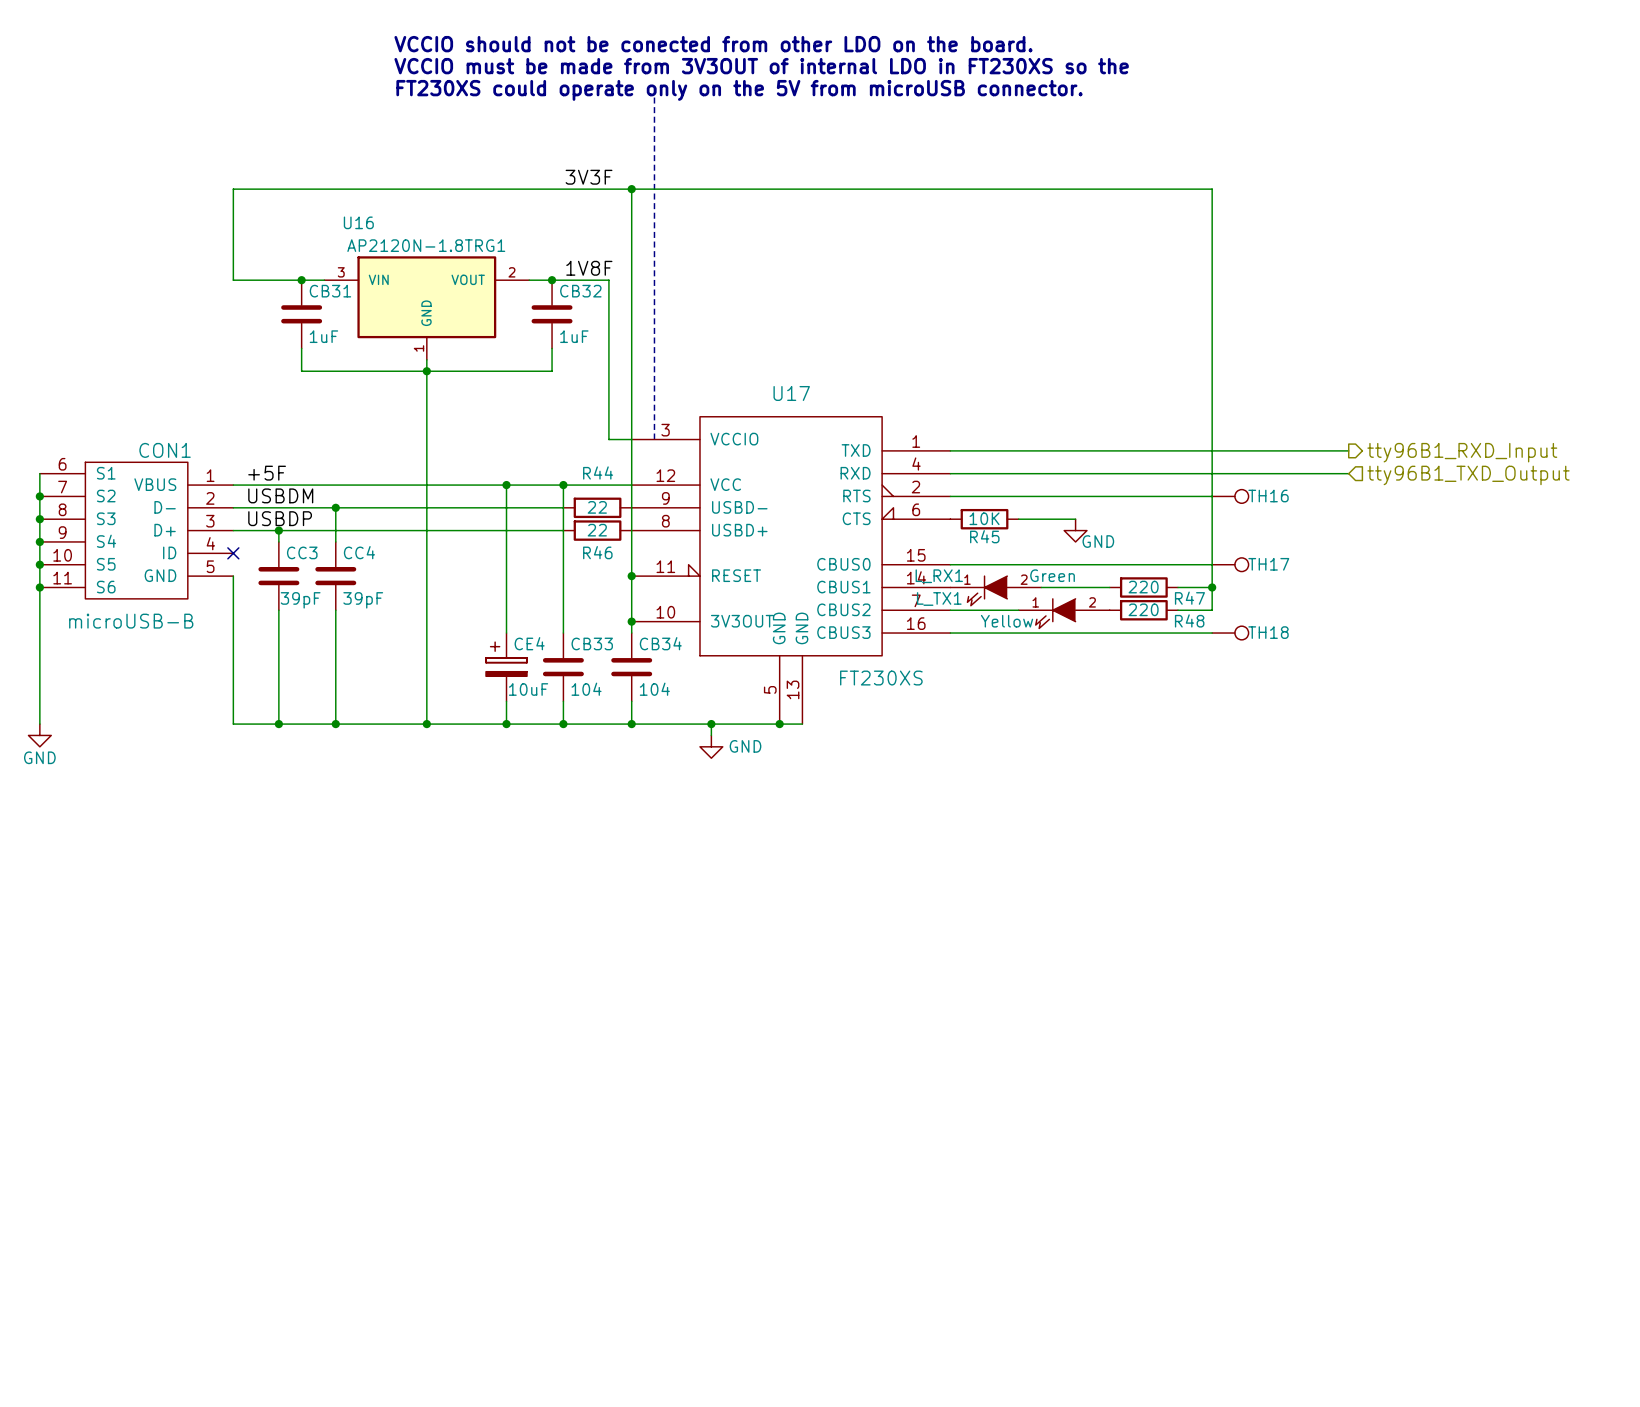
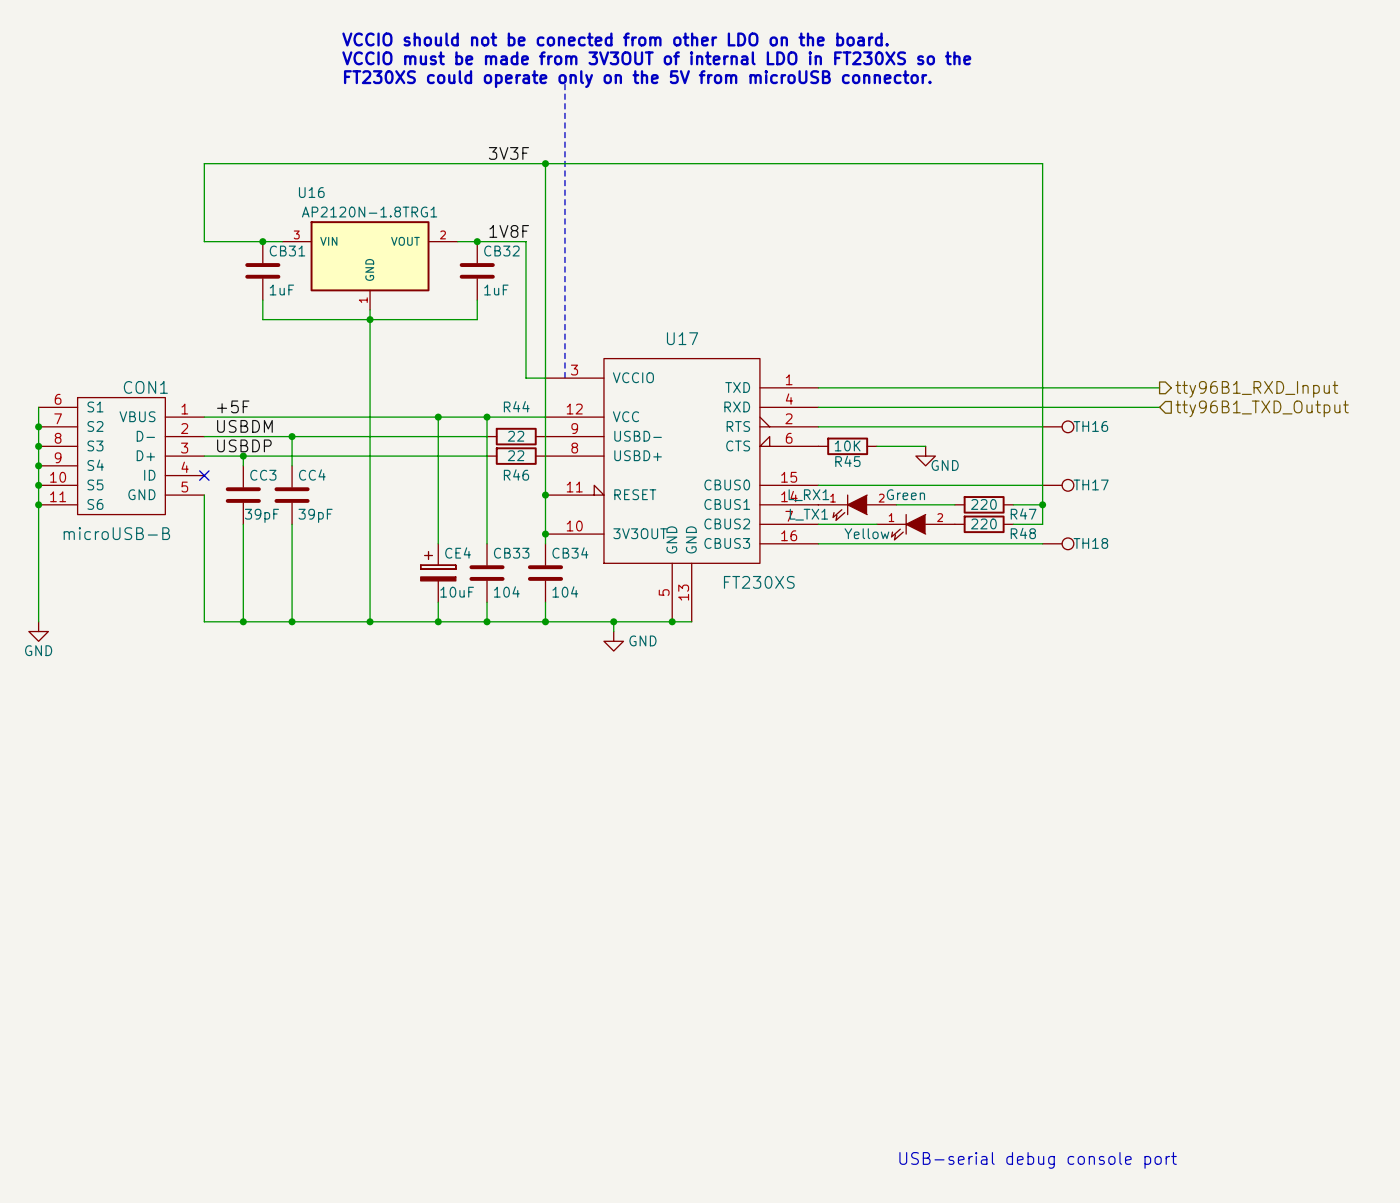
text: none -> USB-serial debug console port (1038, 1160)

